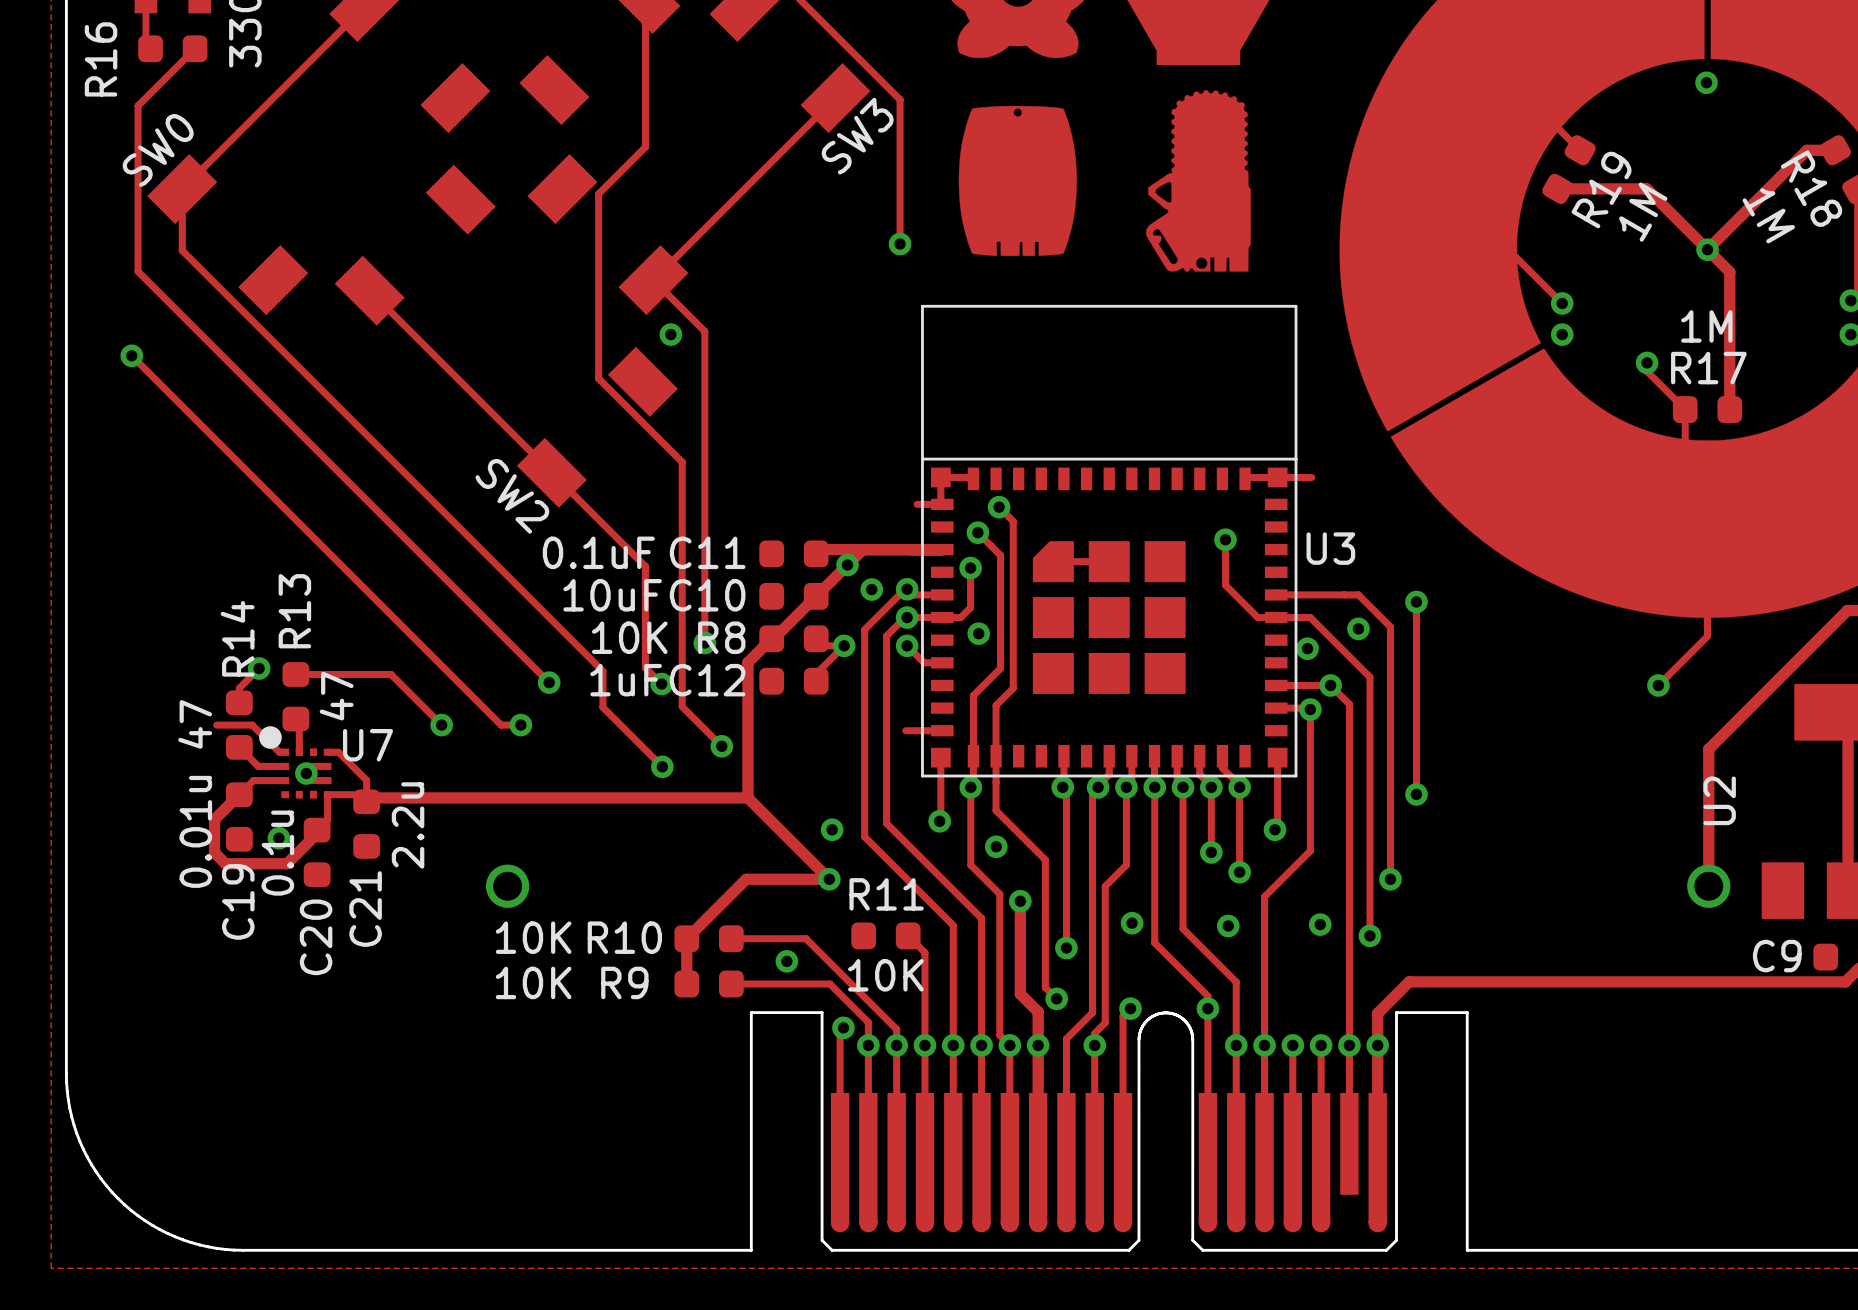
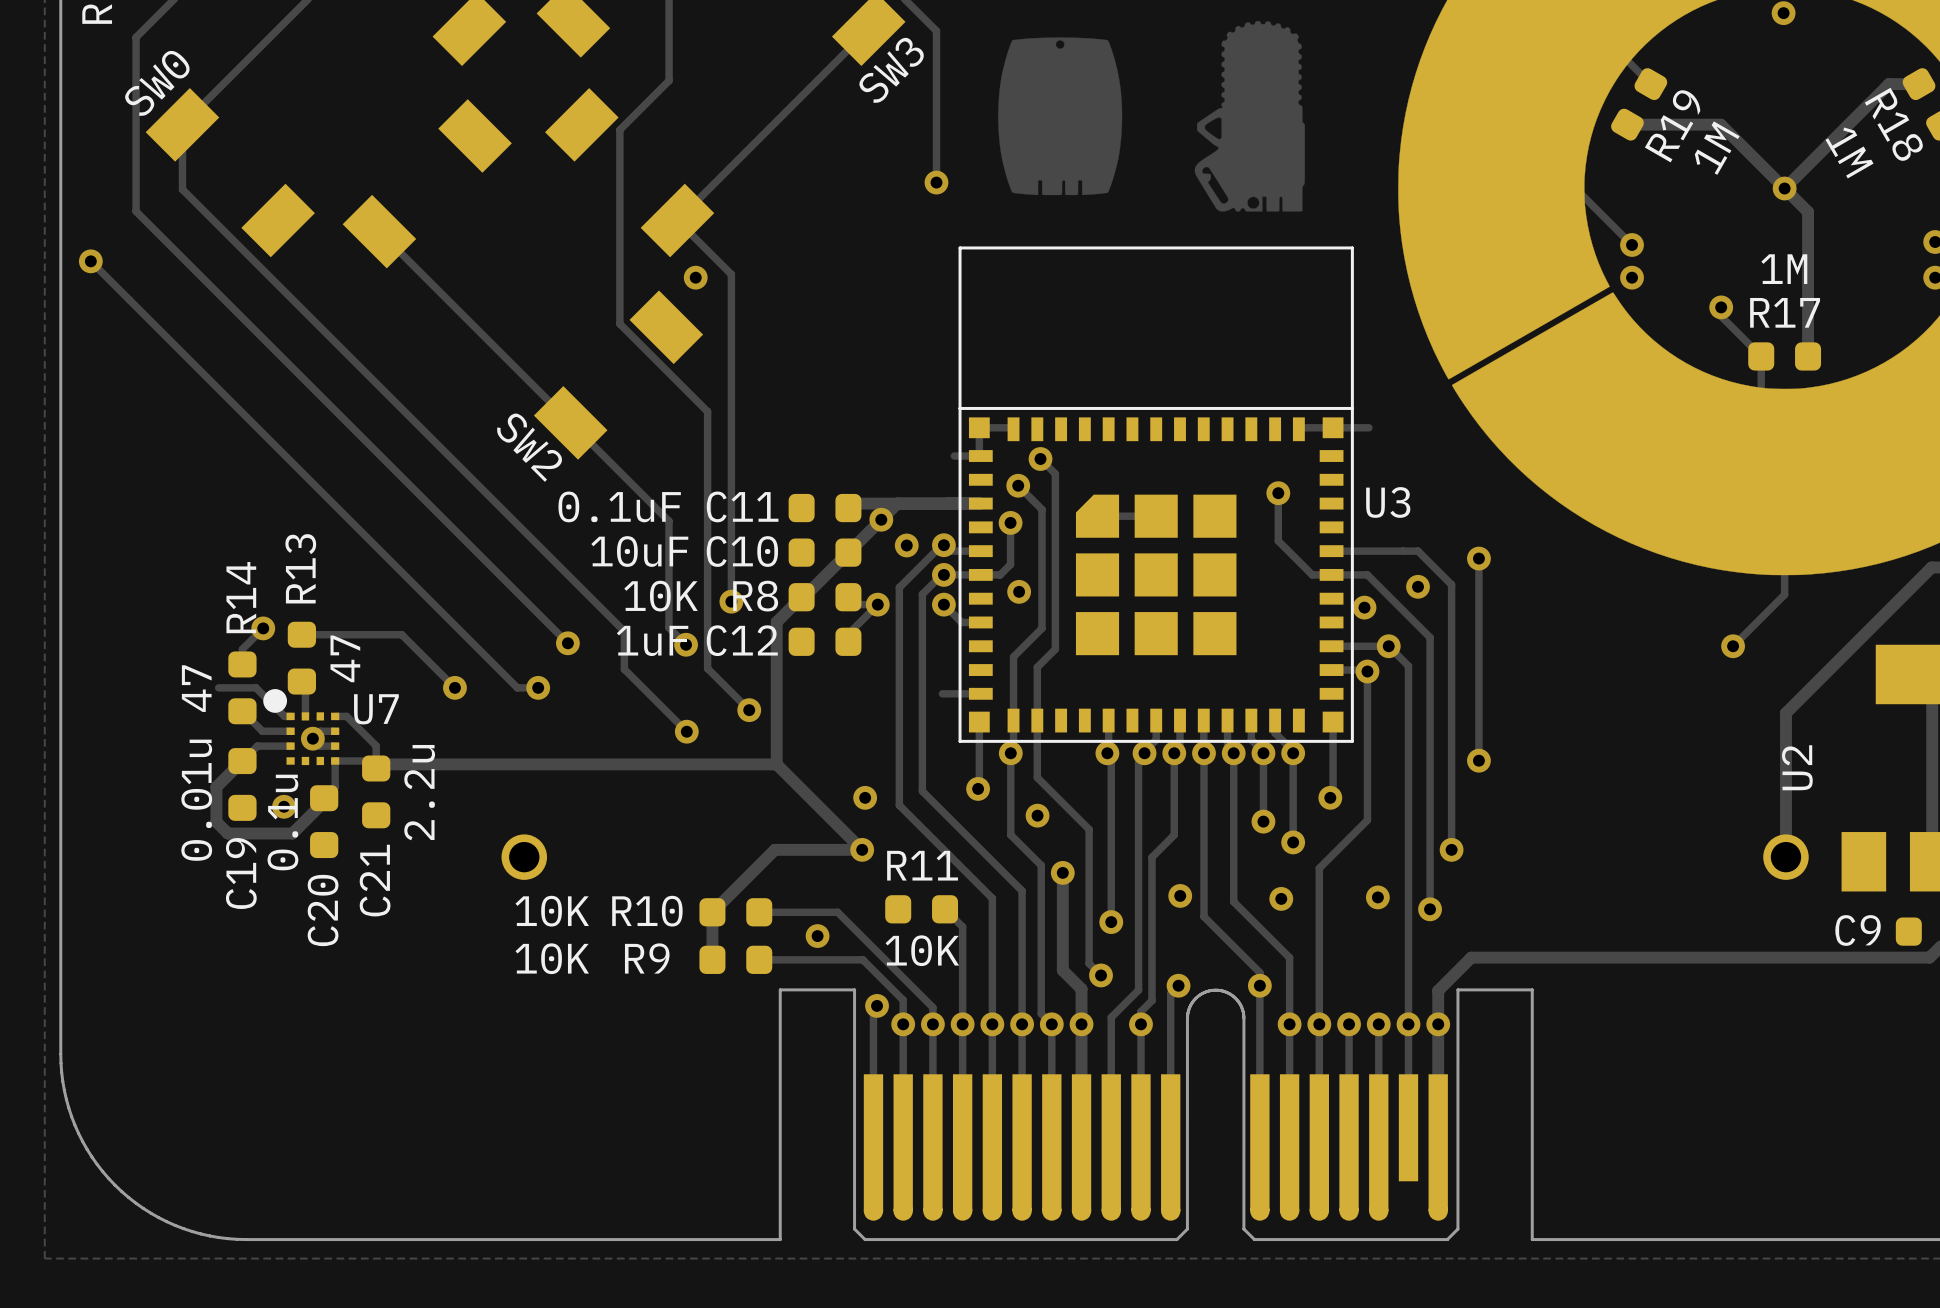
track: none -> (90, 261) (129, 299)
via position: (131, 355) -> (90, 261)

